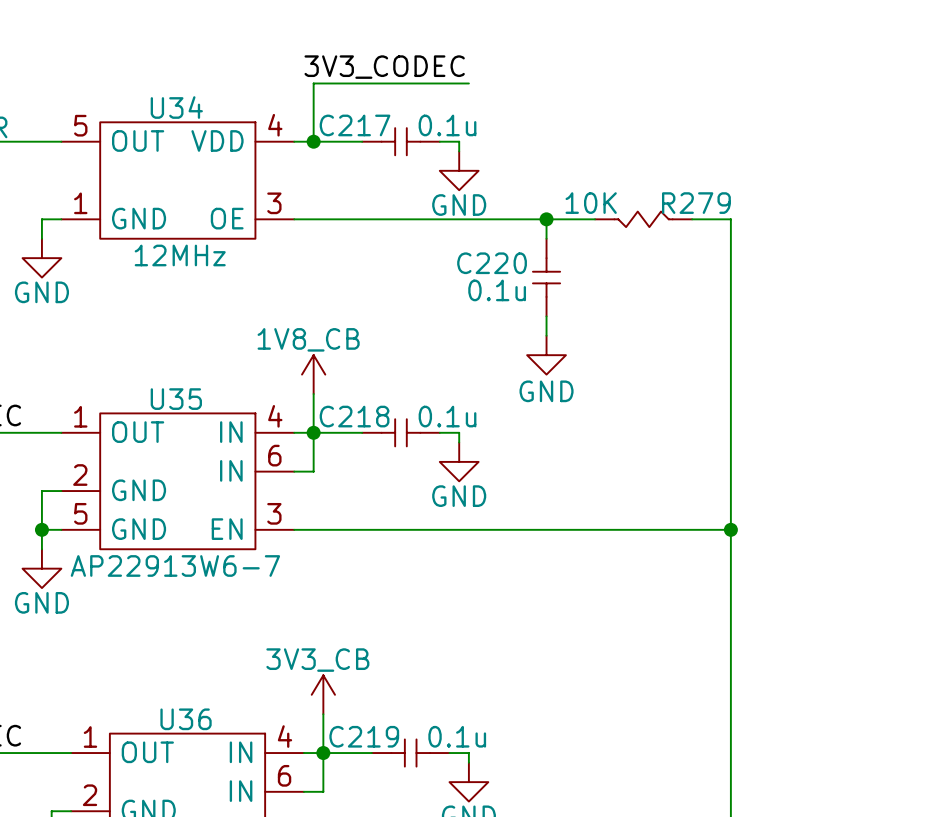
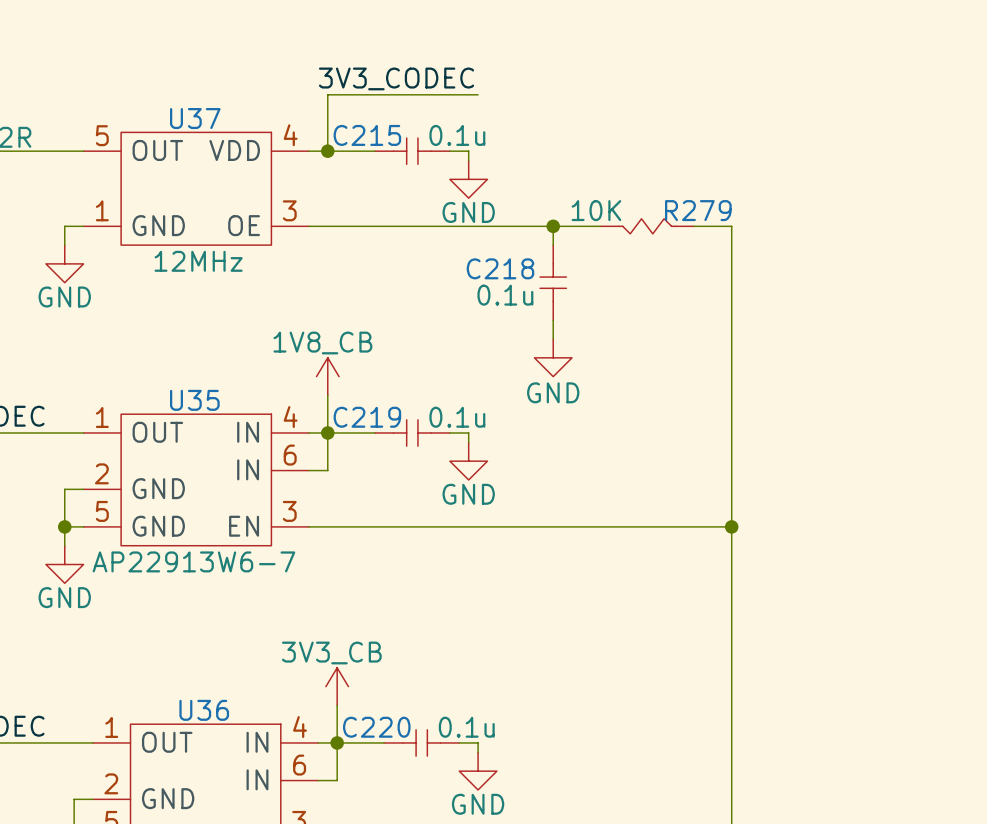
U34 name: U34 (176, 107) -> U37 (195, 118)
C217 name: C217 (355, 125) -> C215 (367, 135)
C220 name: C220 (492, 263) -> C218 (500, 268)
C218 name: C218 (354, 416) -> C219 (367, 417)
C219 name: C219 (364, 736) -> C220 (376, 727)

